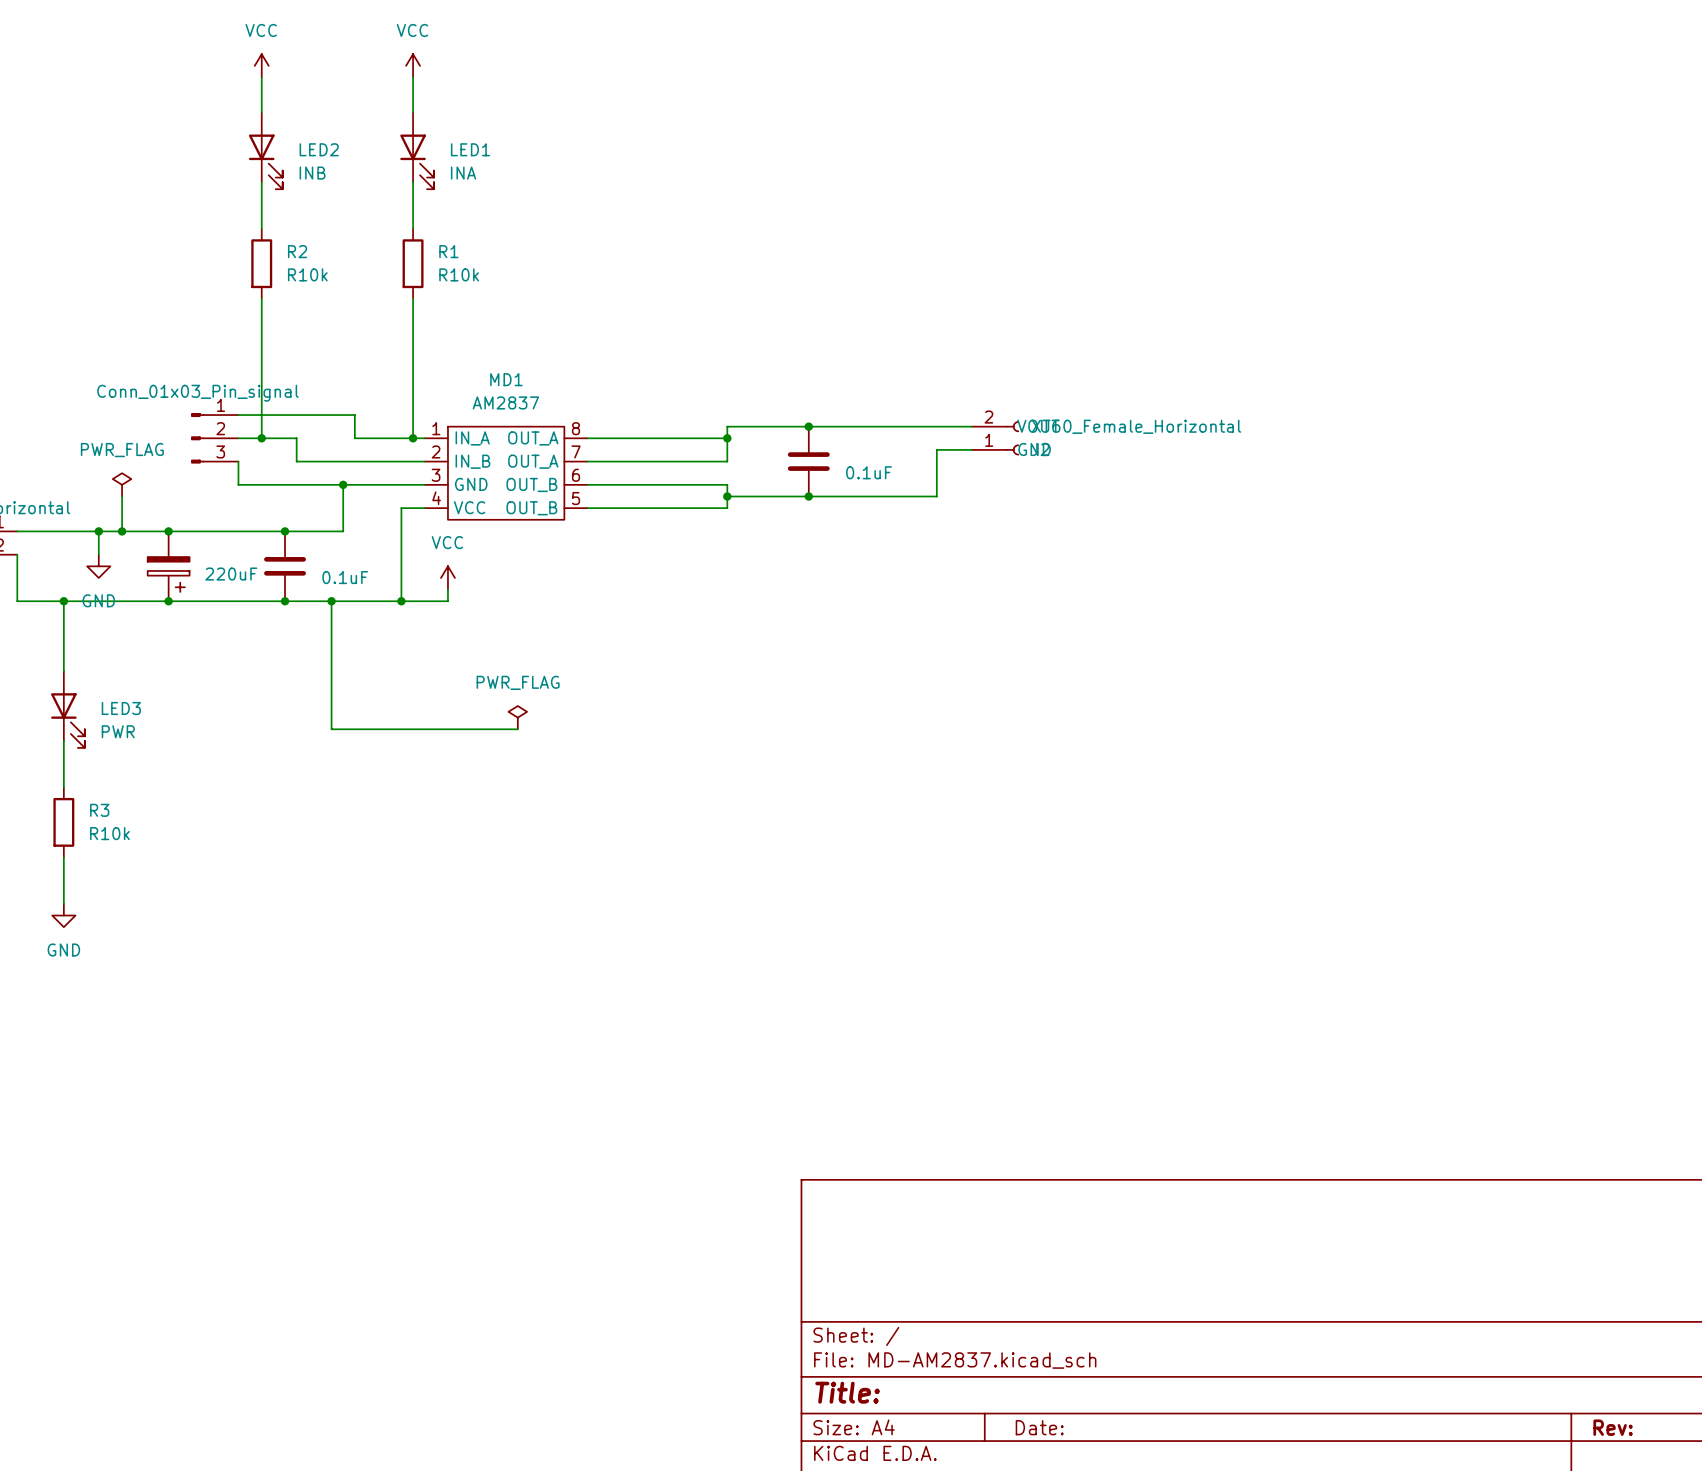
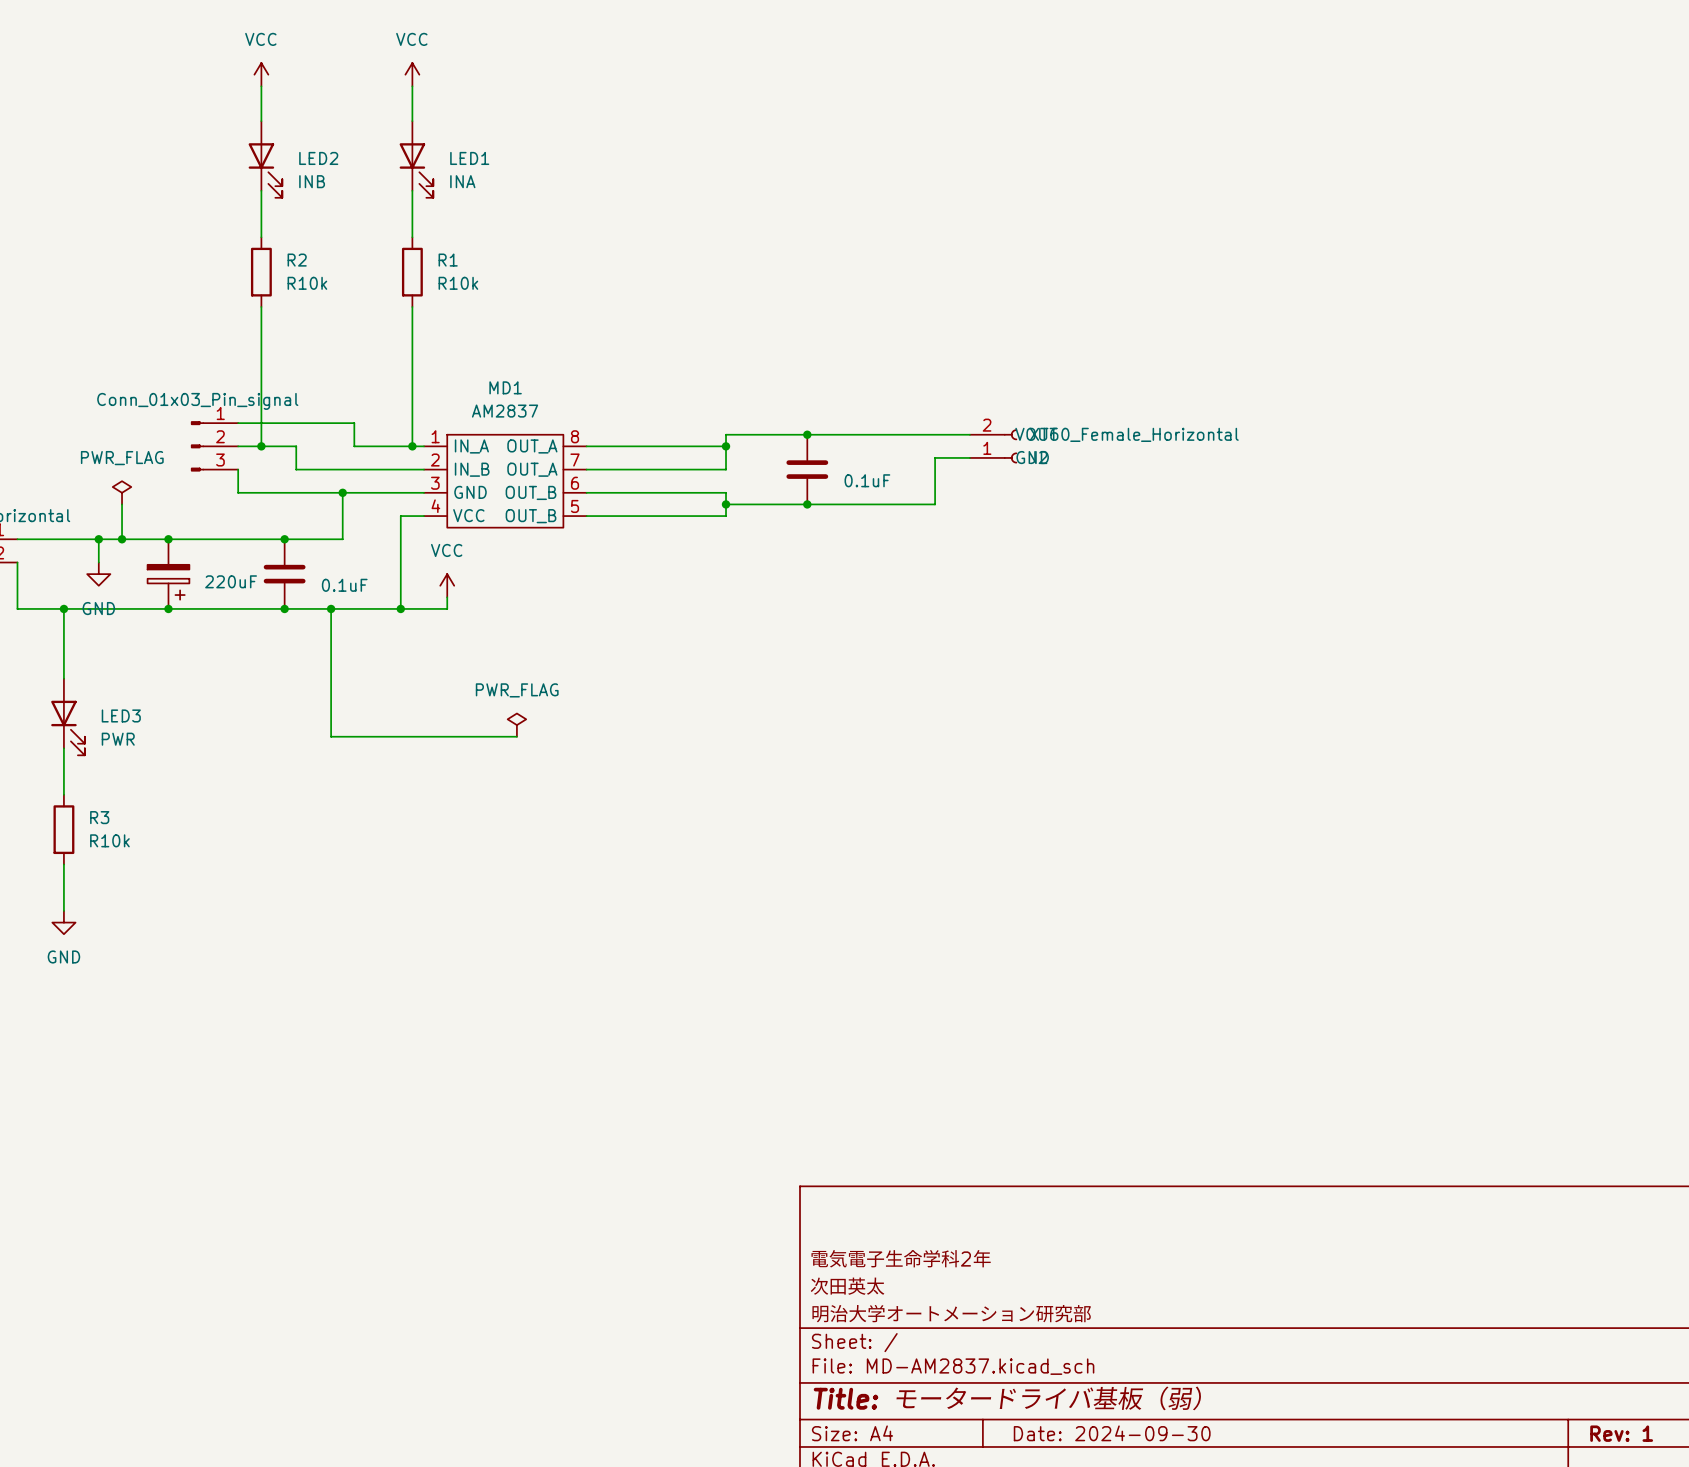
title block: none -> 電気電子生命学科2年 (901, 1258)
title block: none -> 次田英太 (847, 1286)
title block: none -> 明治大学オートメーション研究部 (951, 1313)
title block: Title: (847, 1392) -> Title: モータードライバ基板（弱） (1008, 1398)
title block: Date: (1039, 1427) -> Date: 2024-09-30 (1112, 1433)
title block: Rev: (1613, 1427) -> Rev: 1 (1621, 1433)

